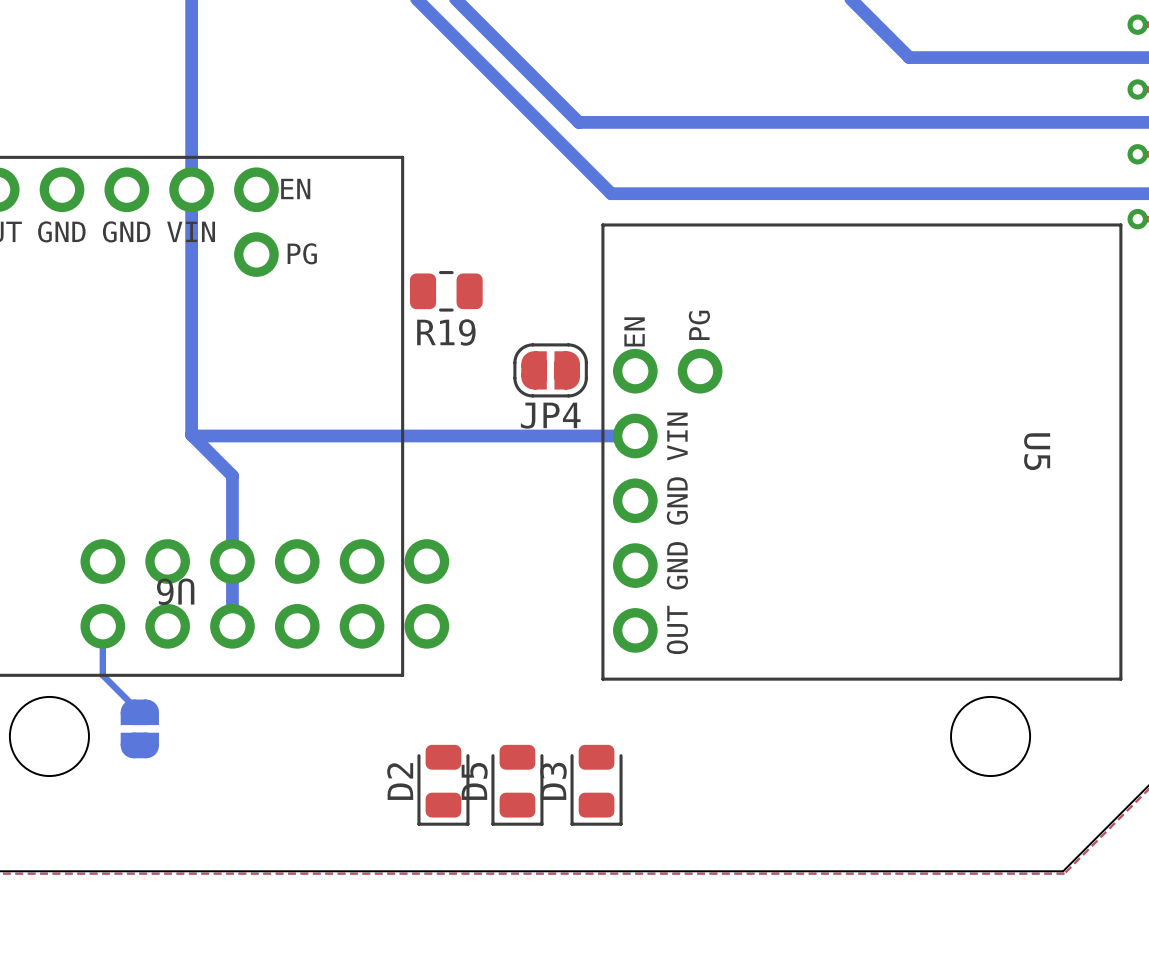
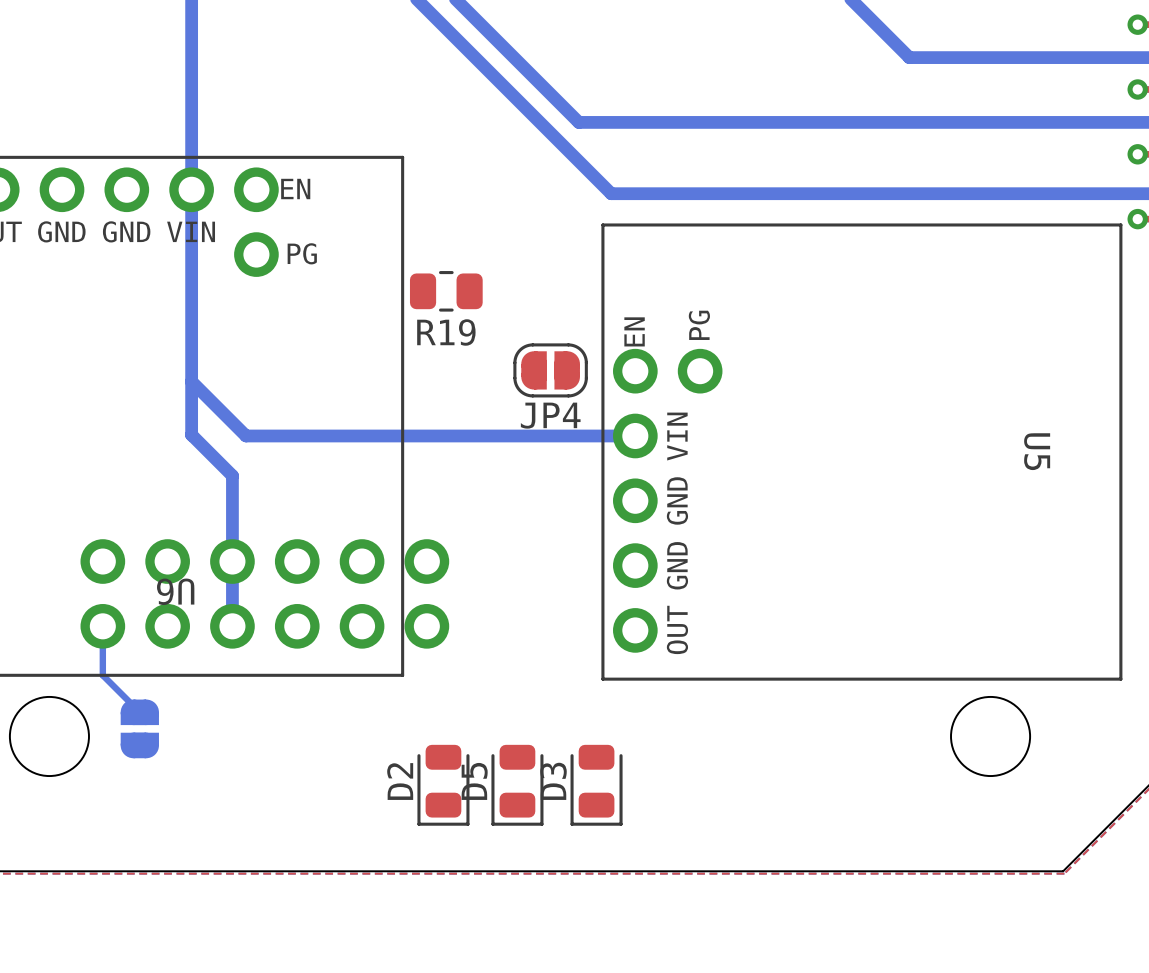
bottom track: (192, 435) (246, 435) -> (191, 381) (246, 435)

